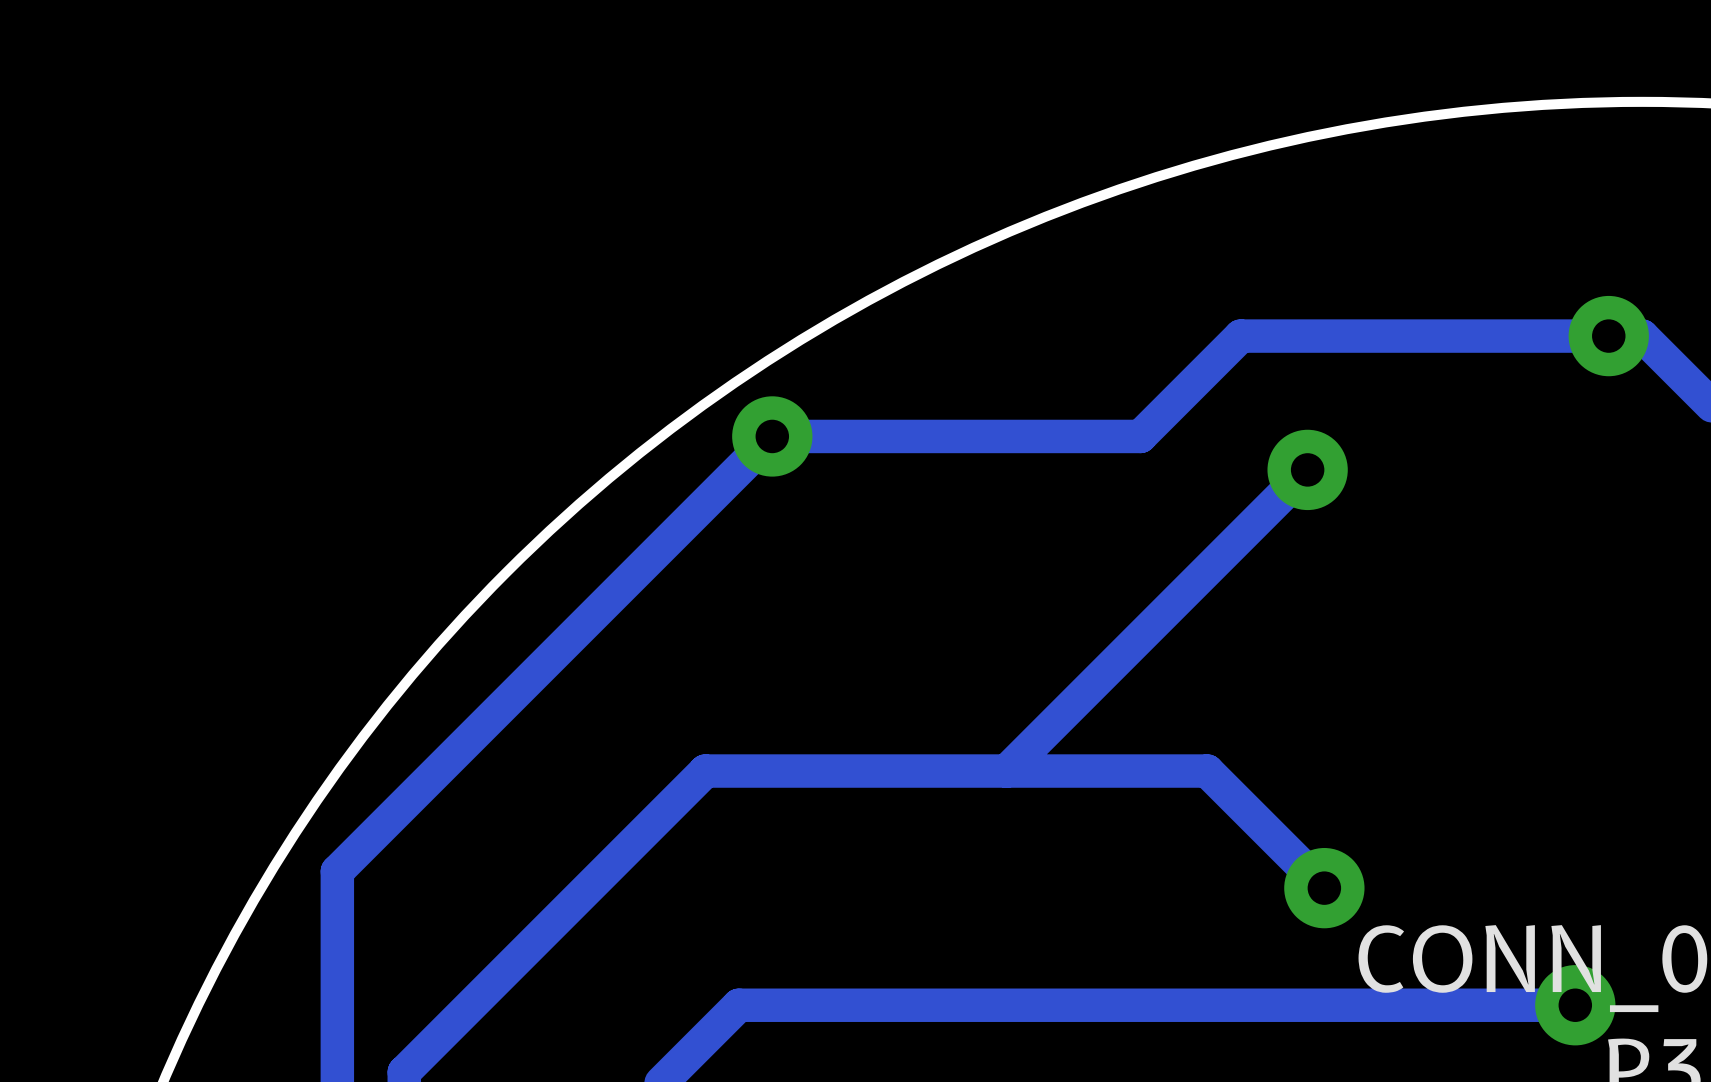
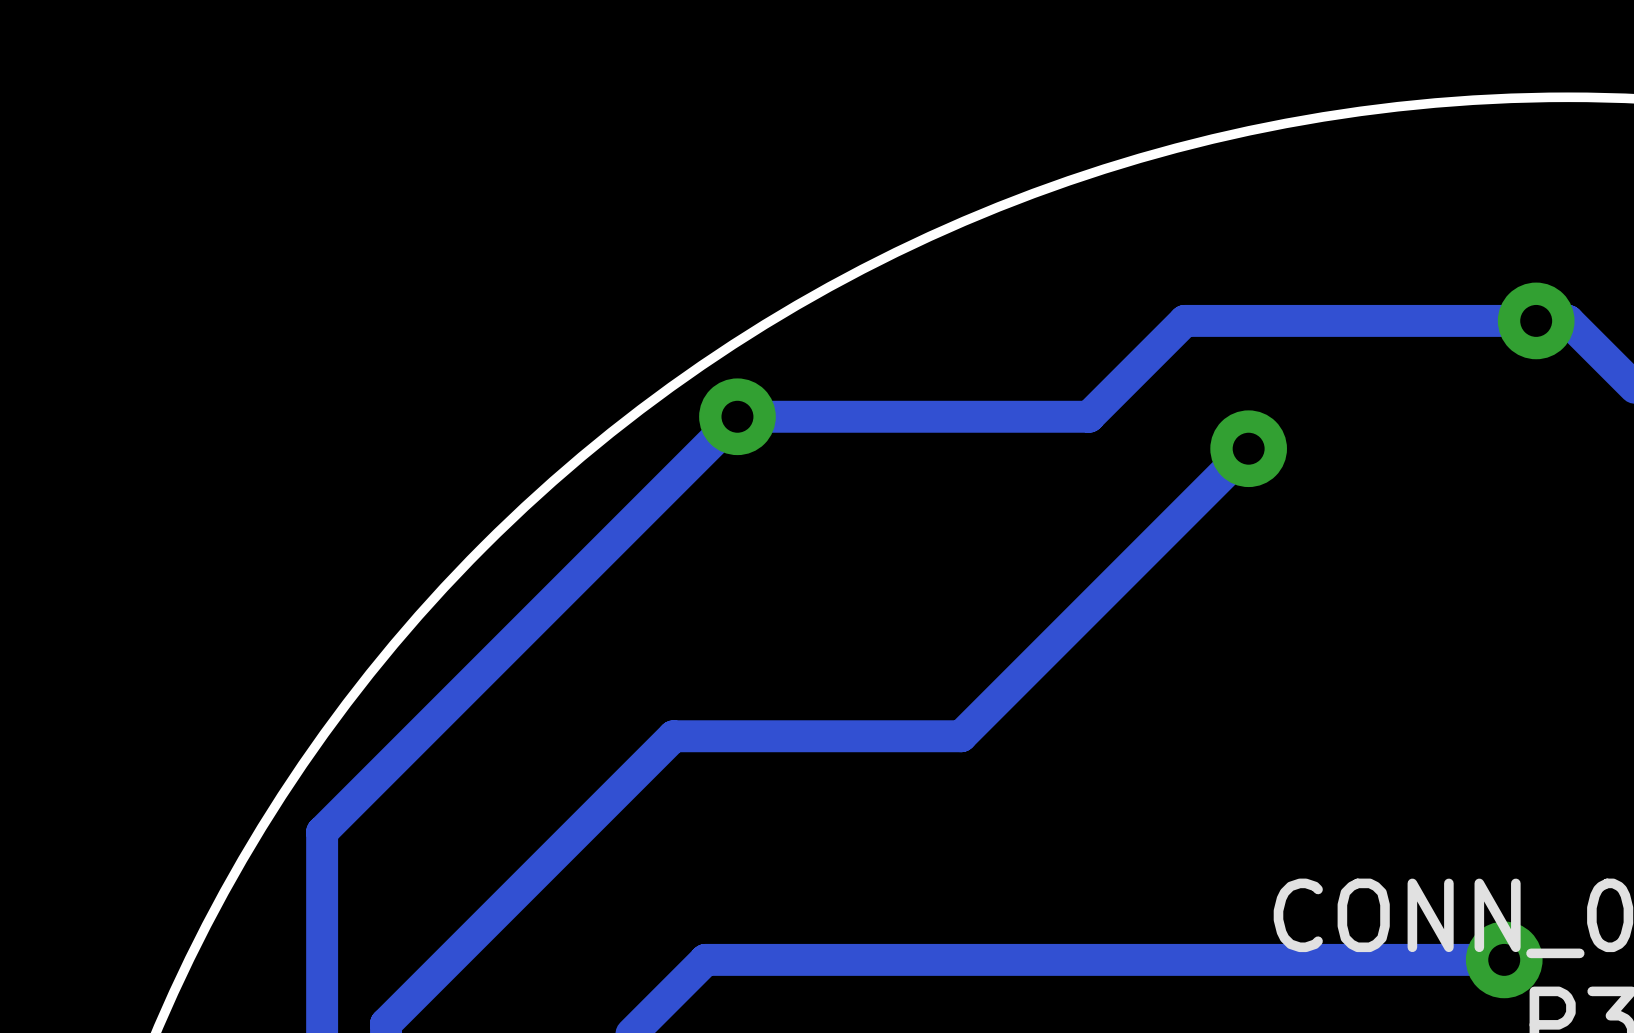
track: (1006, 771) (1207, 771) (1324, 888) -> none
via: (1324, 888) -> none

